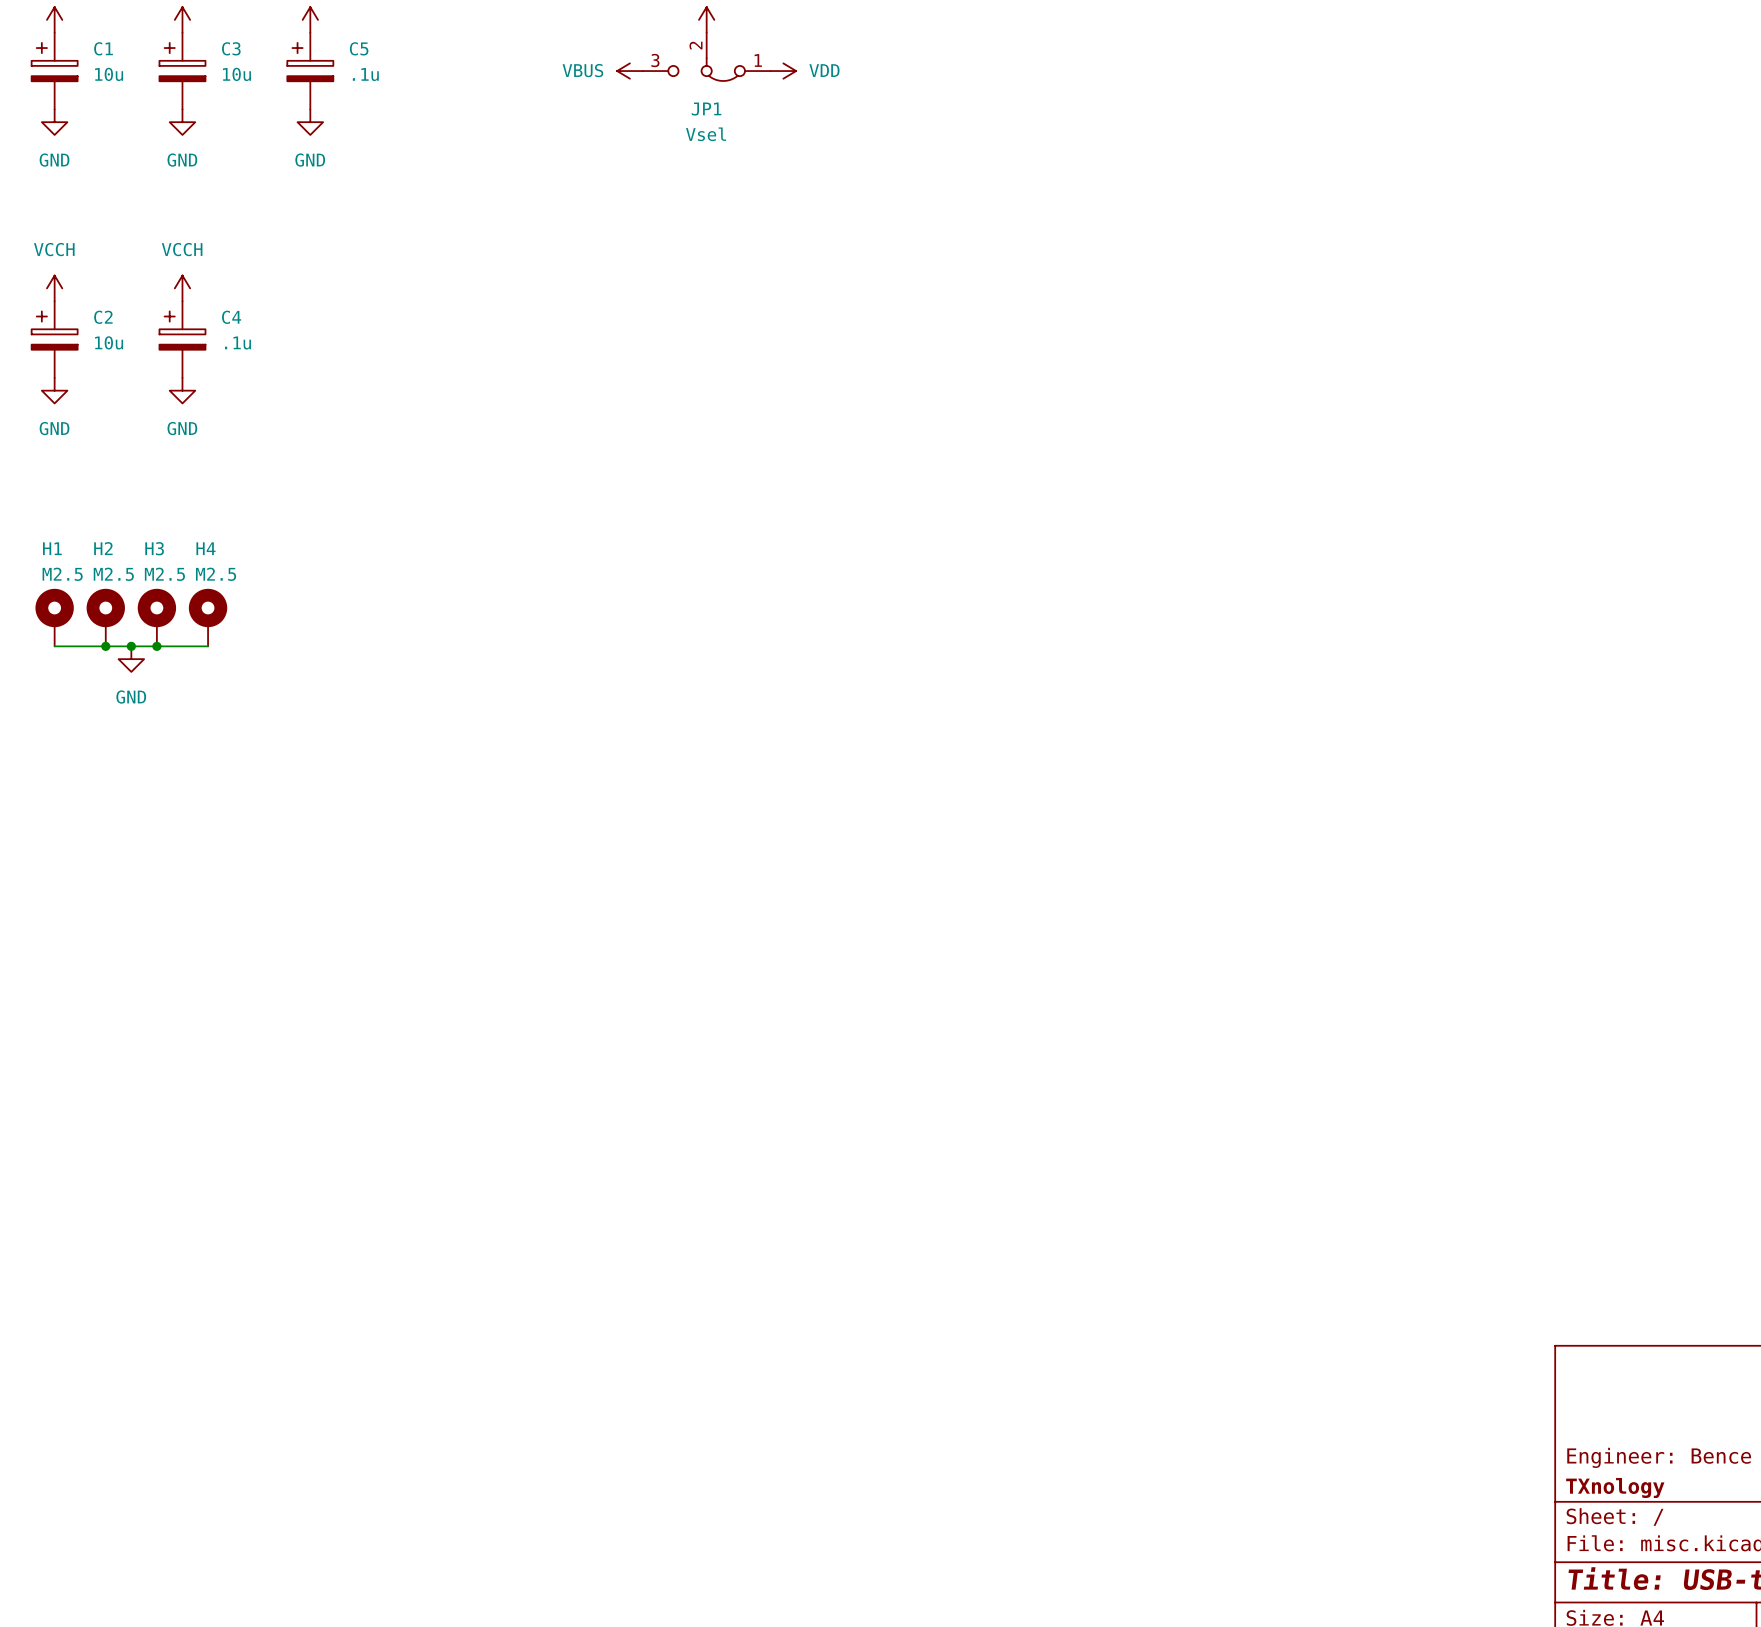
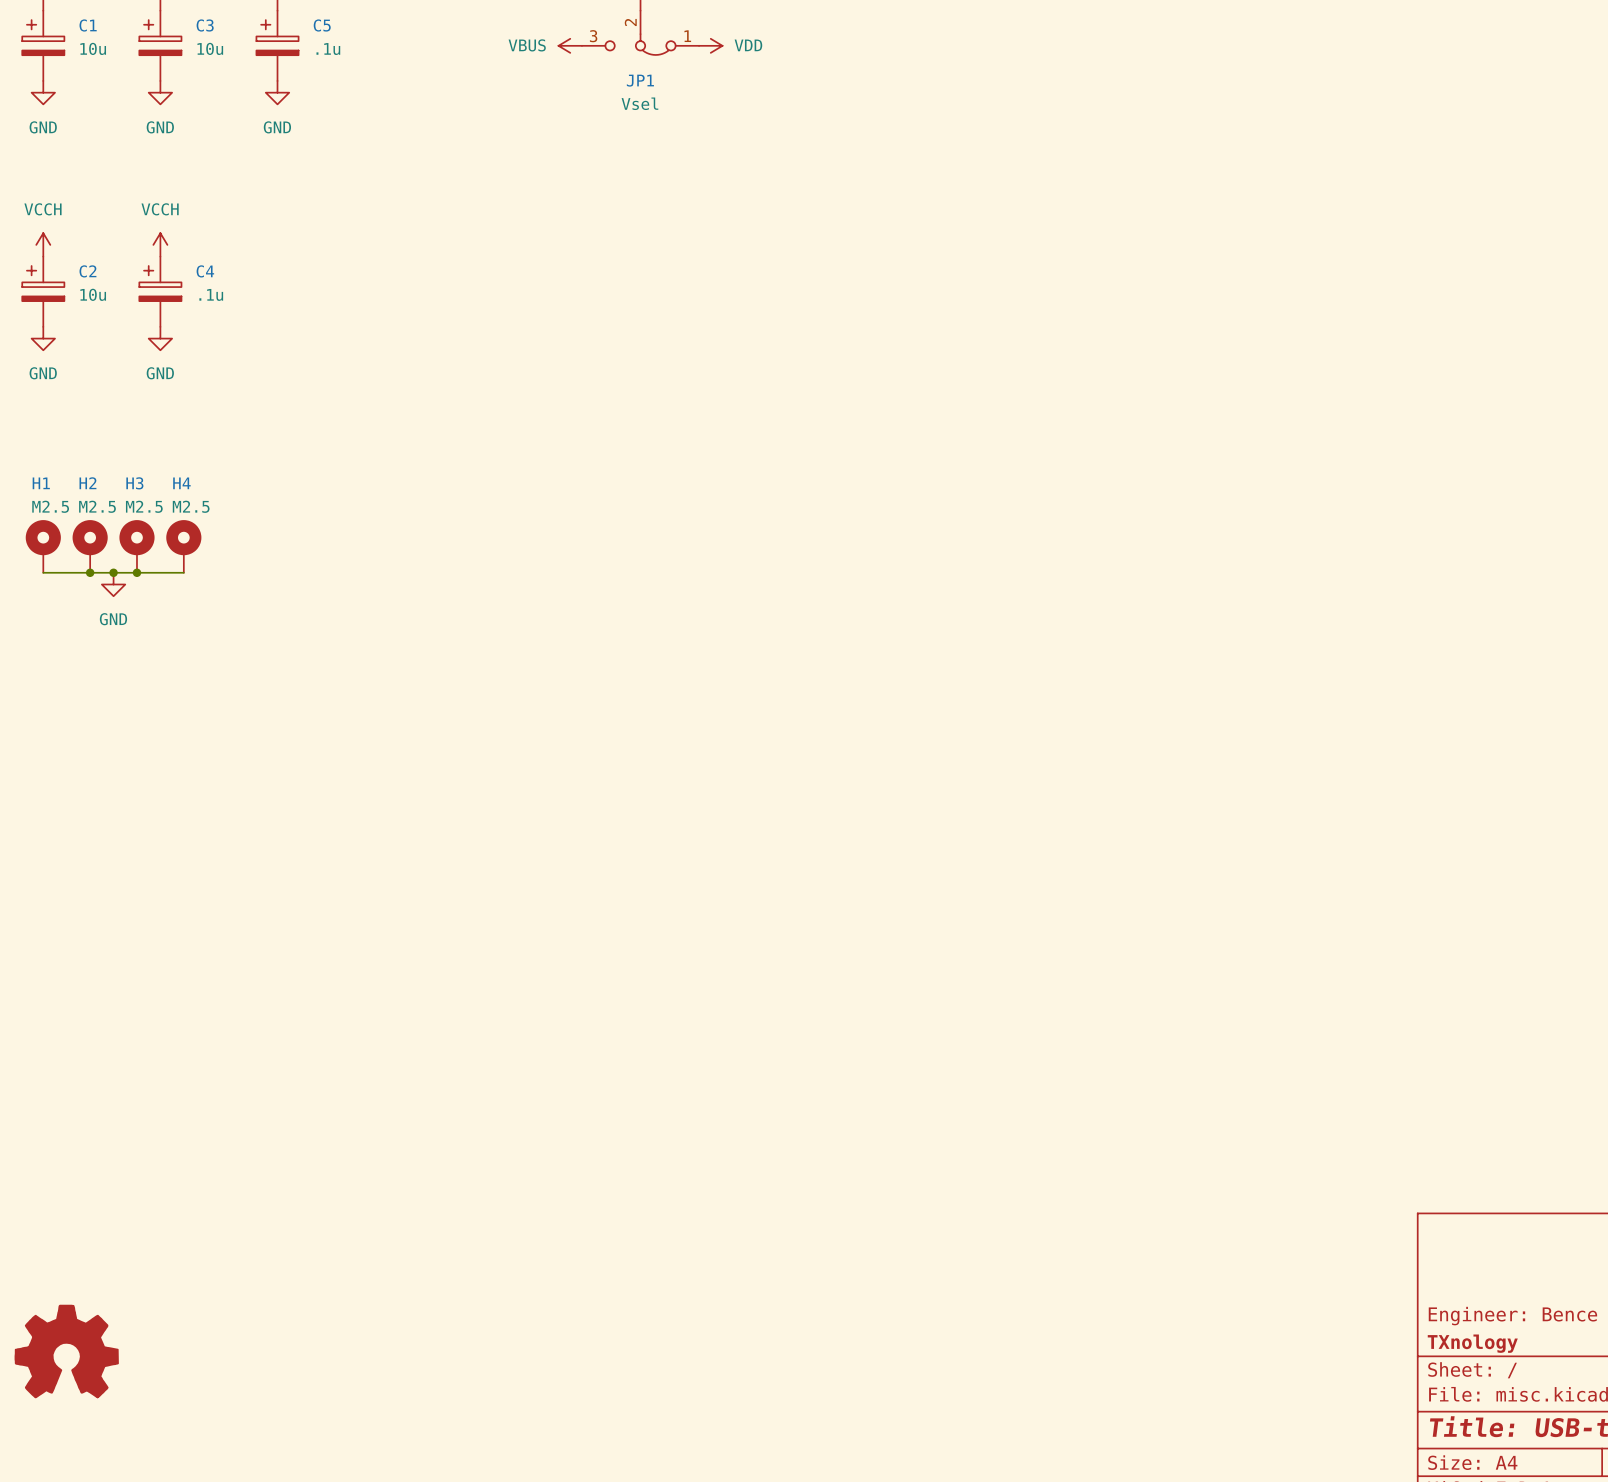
part: none -> (66, 1351)

